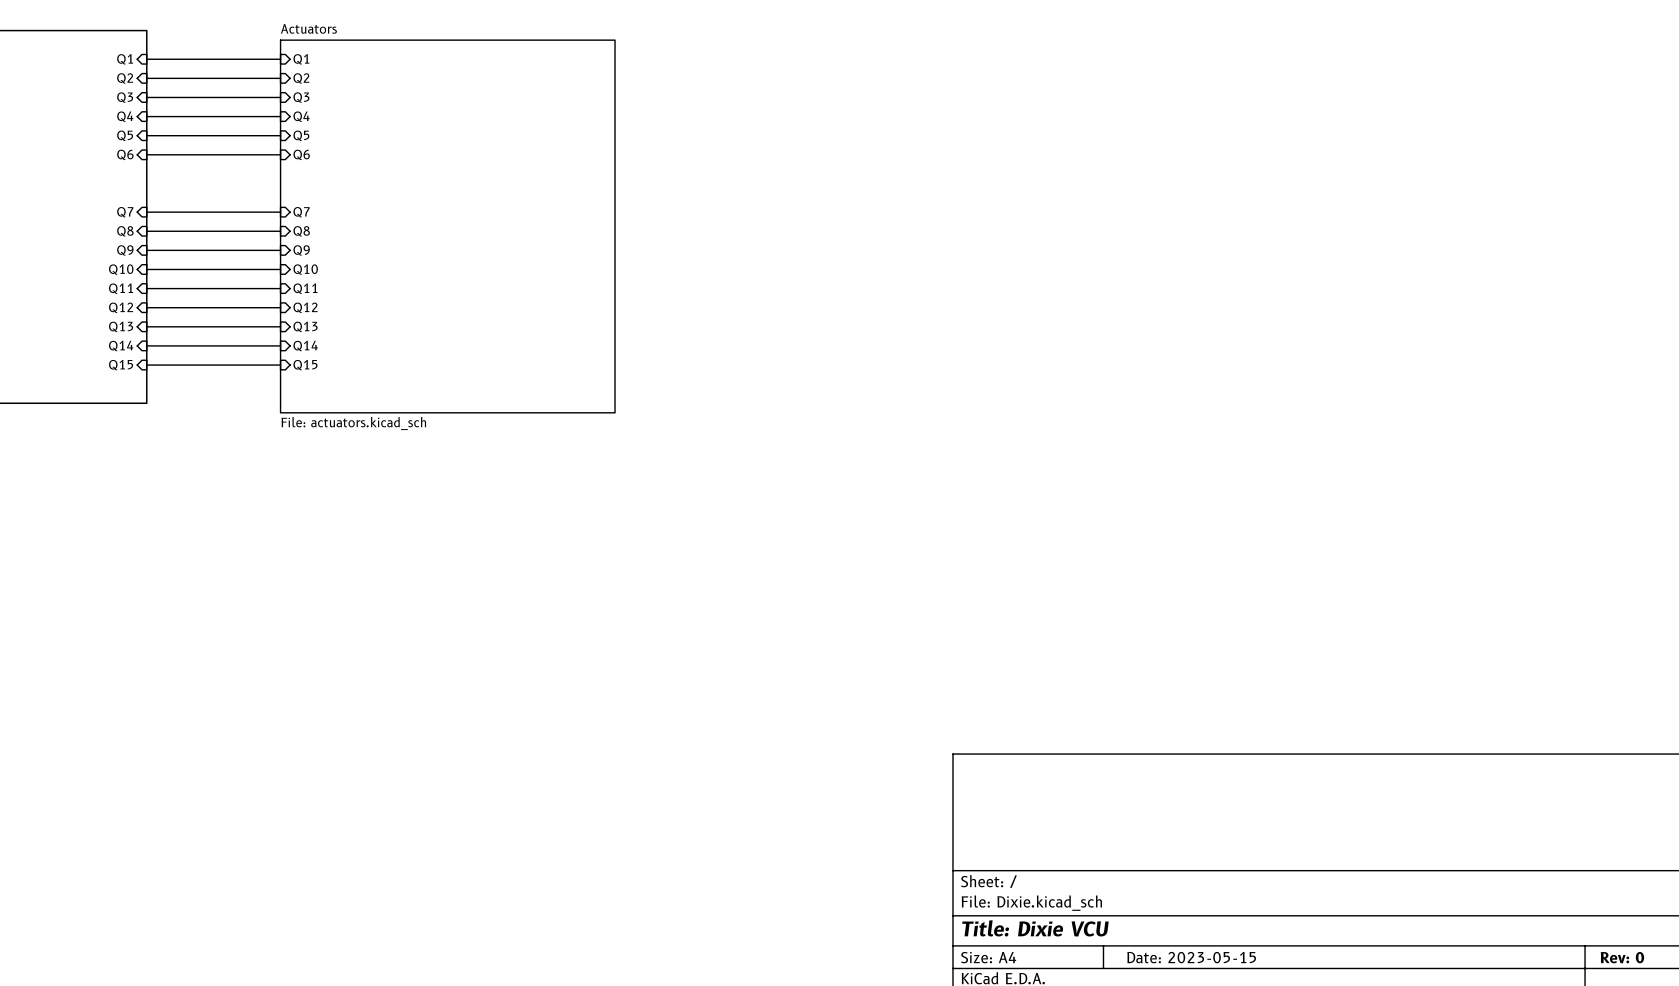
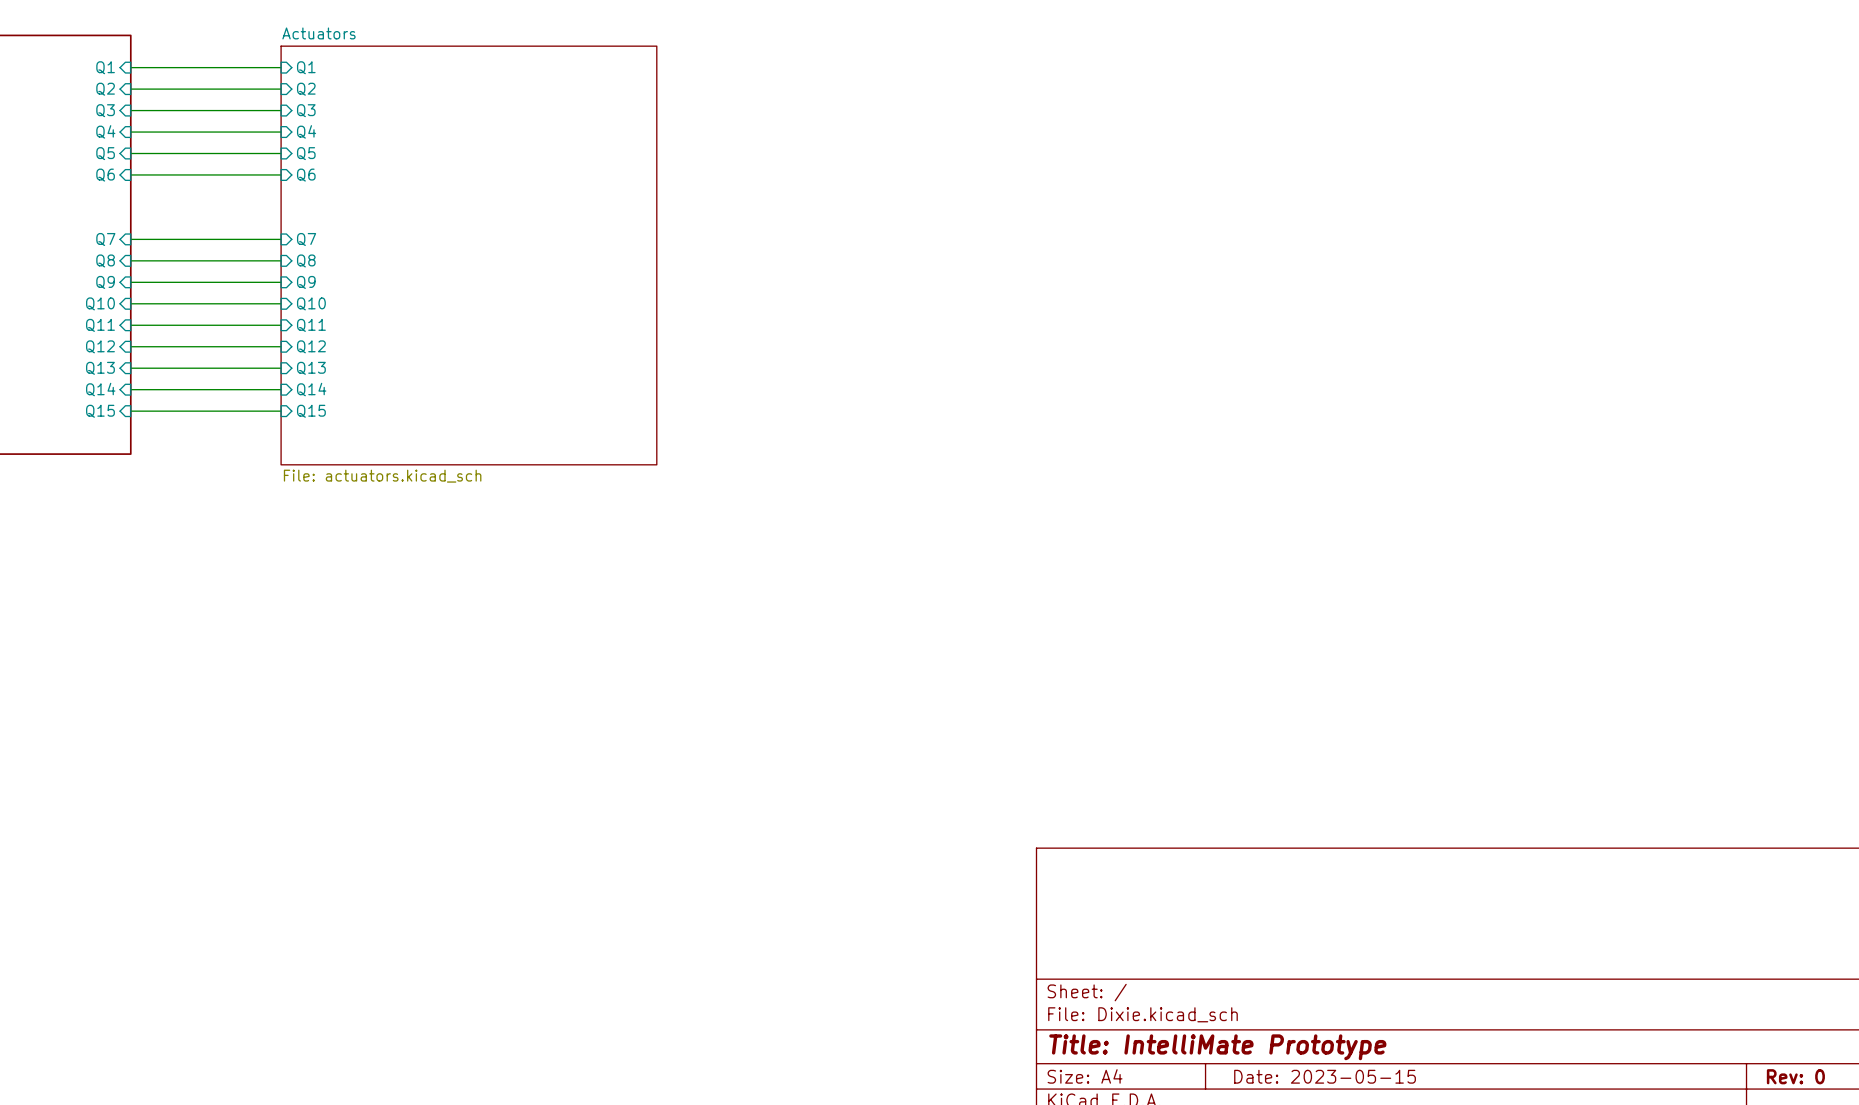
title block: Title: Dixie VCU (1035, 928) -> Title: IntelliMate Prototype (1217, 1047)

